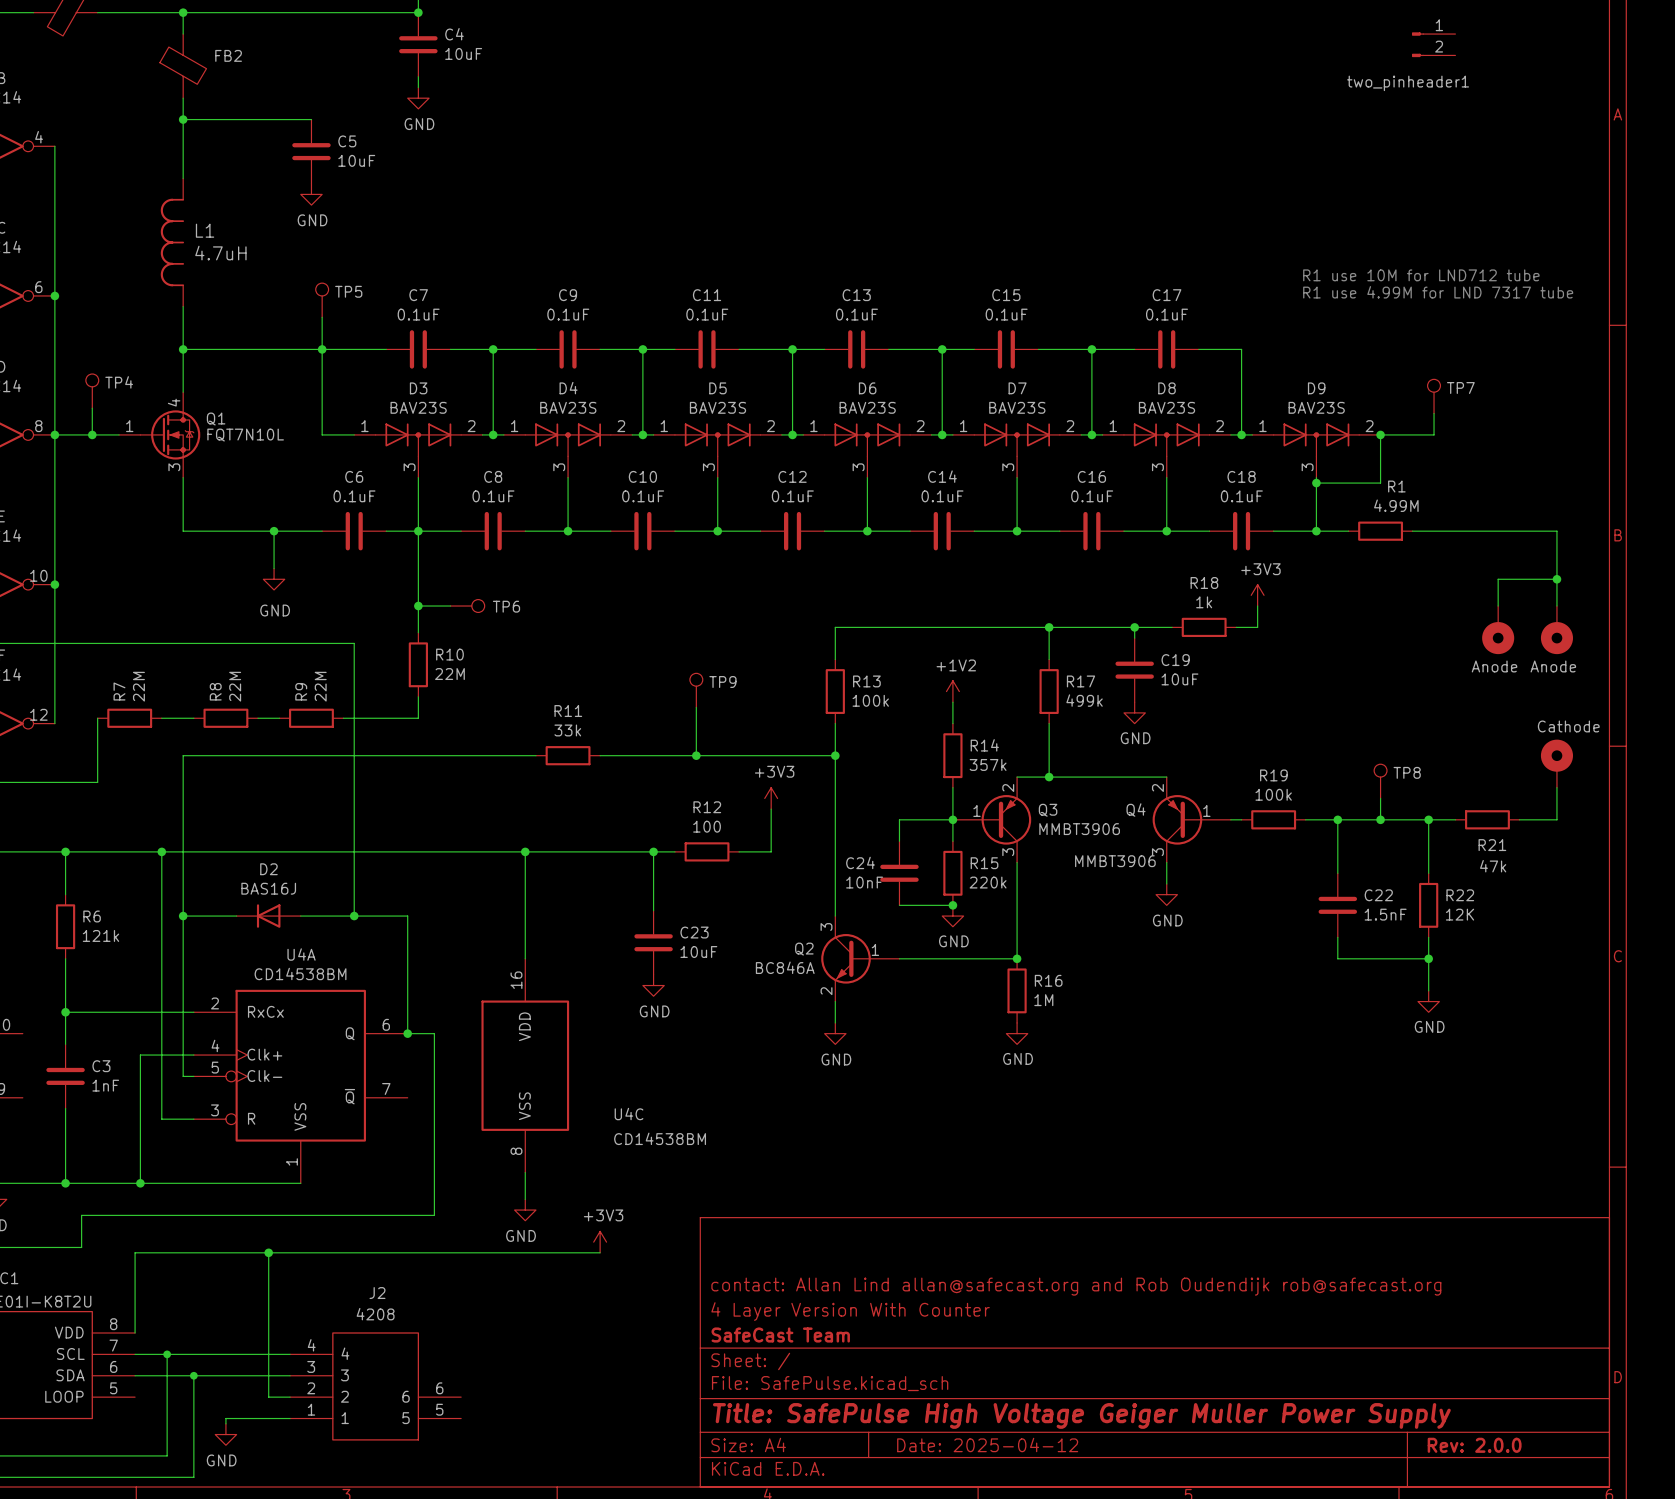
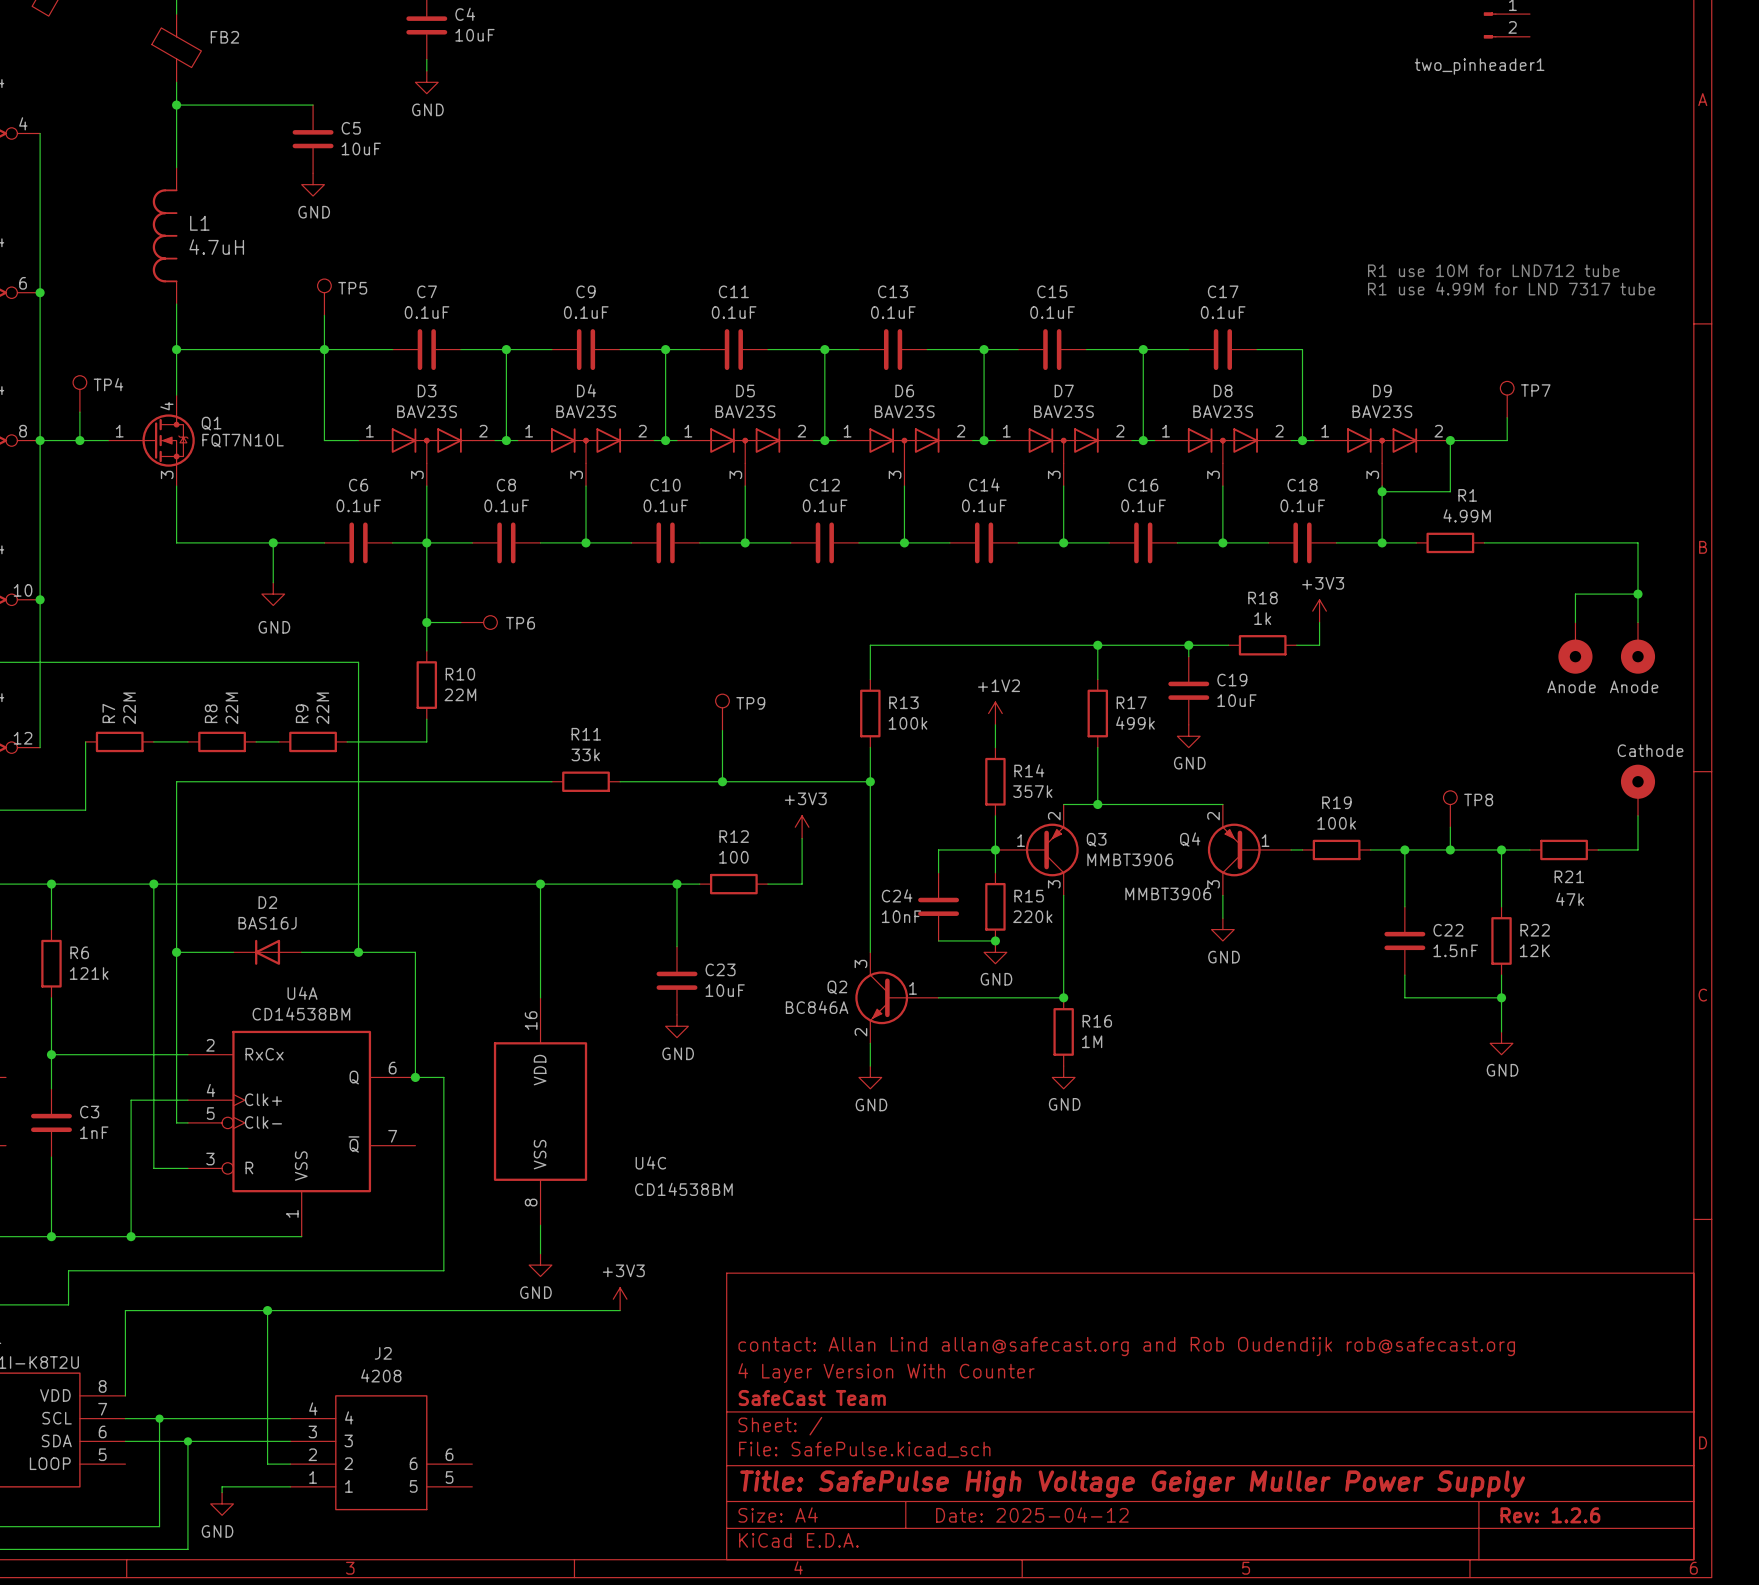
title block: Rev: 2.0.0 (1474, 1445) -> Rev: 1.2.6 (1550, 1515)

